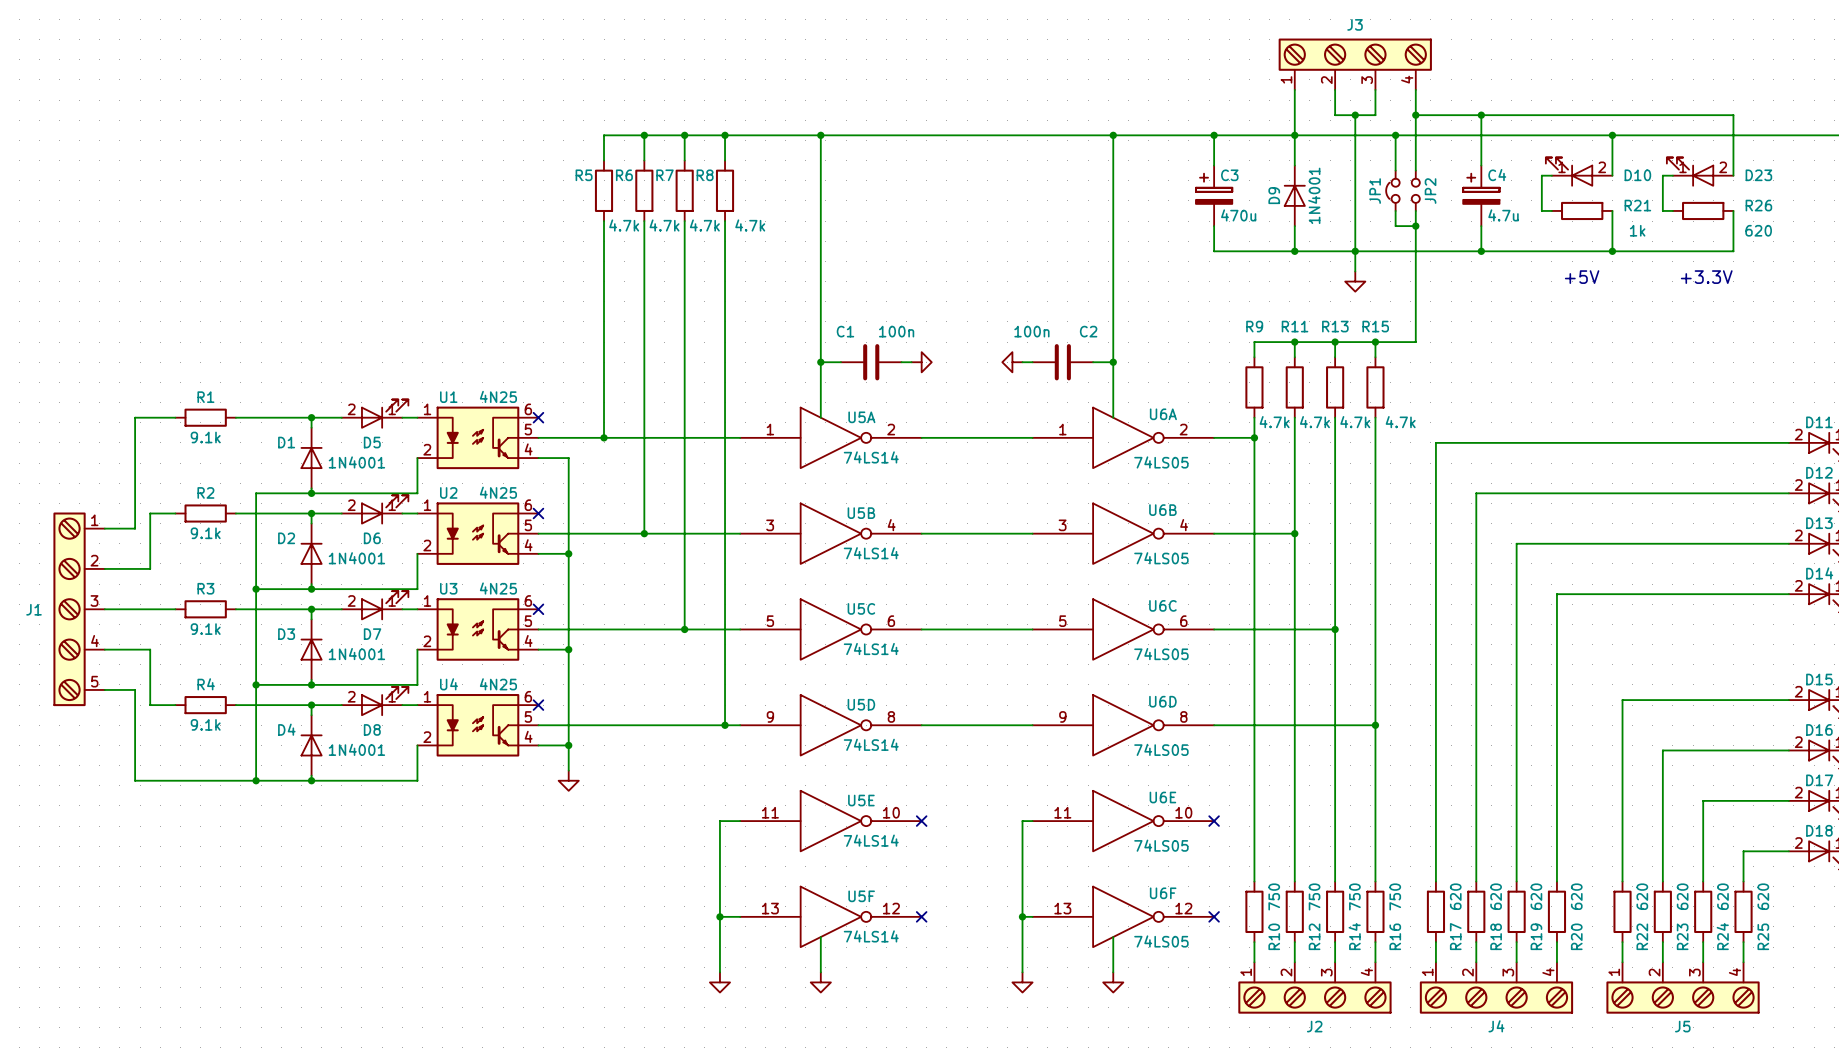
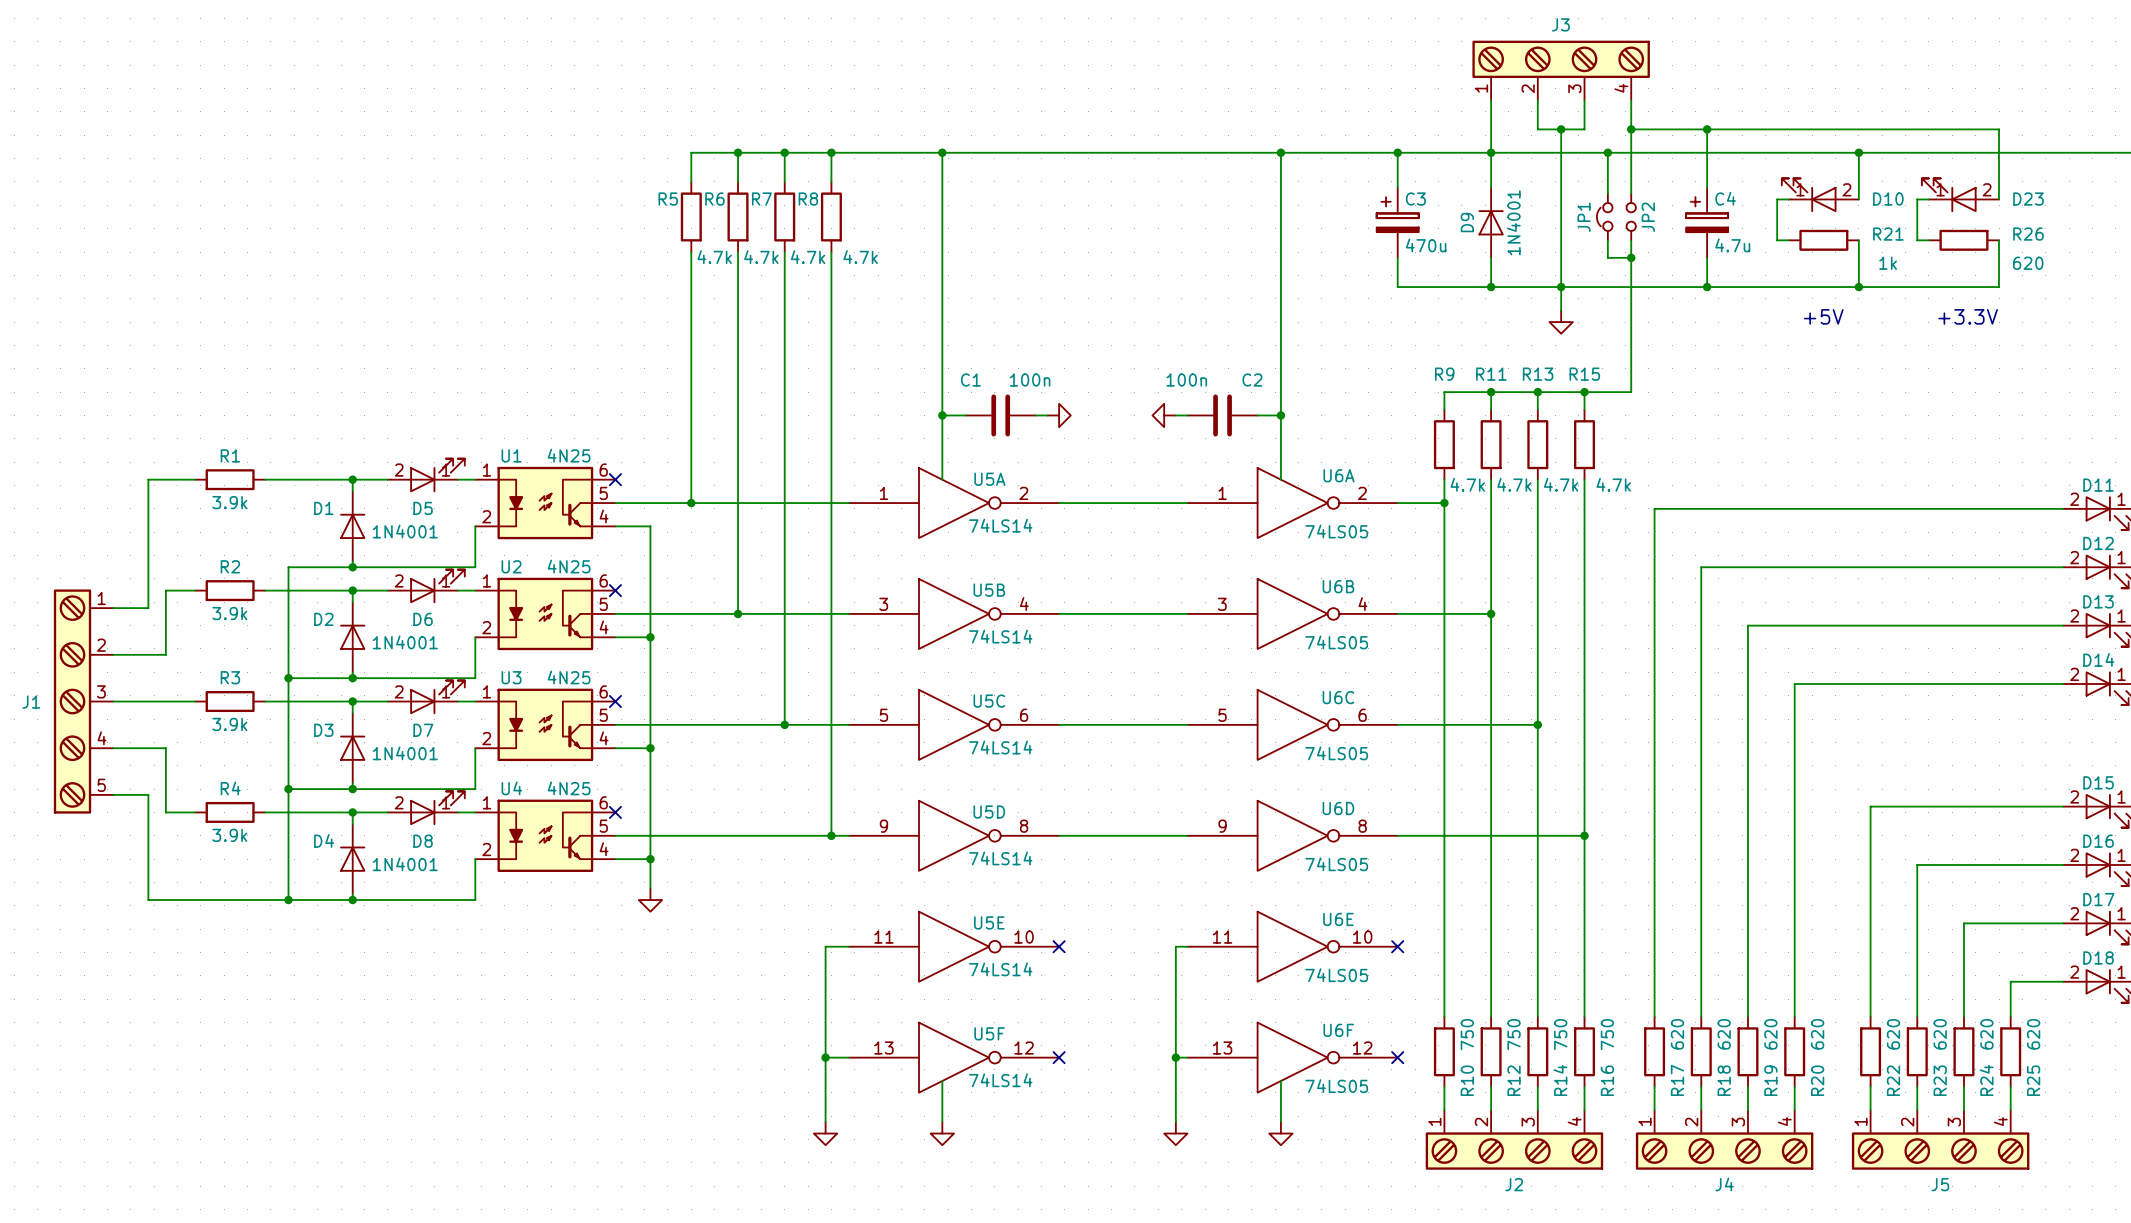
R1 value: 9.1k (205, 437) -> 3.9k (229, 502)
R2 value: 9.1k (205, 533) -> 3.9k (229, 613)
R3 value: 9.1k (205, 629) -> 3.9k (229, 724)
R4 value: 9.1k (205, 724) -> 3.9k (229, 835)

